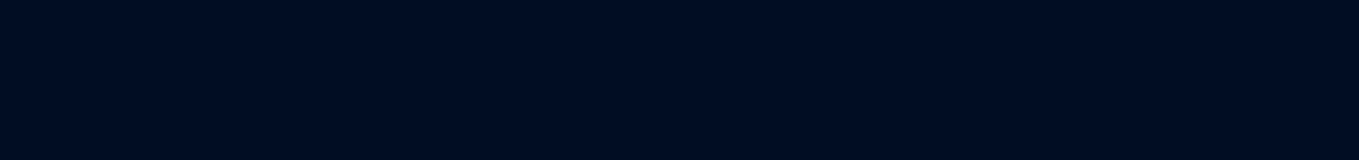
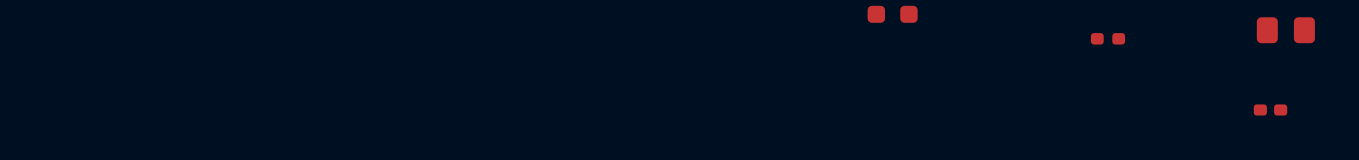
part: none -> (892, 14)
part: none -> (1285, 30)
part: none -> (1108, 38)
part: none -> (1270, 109)

